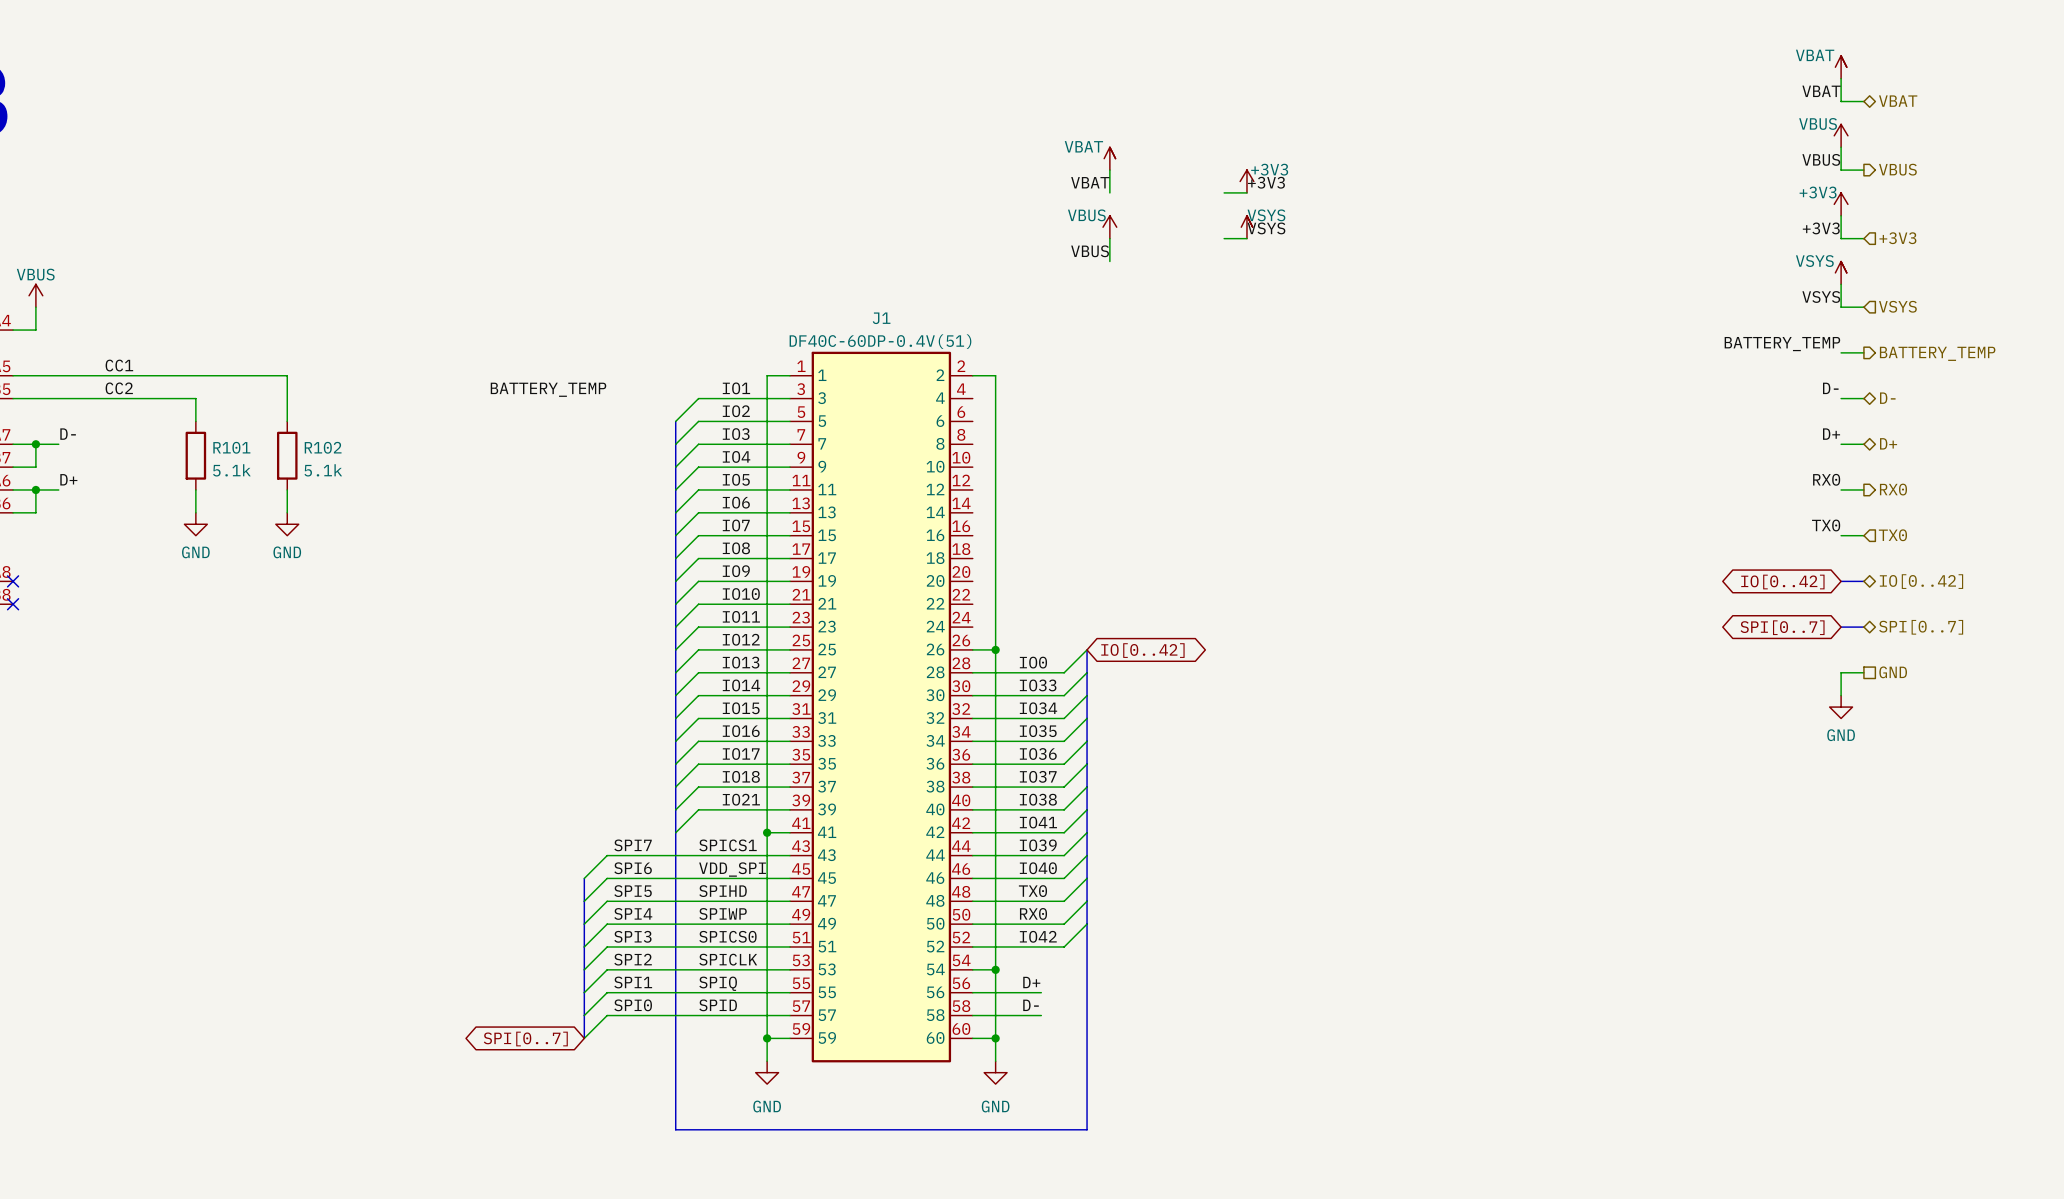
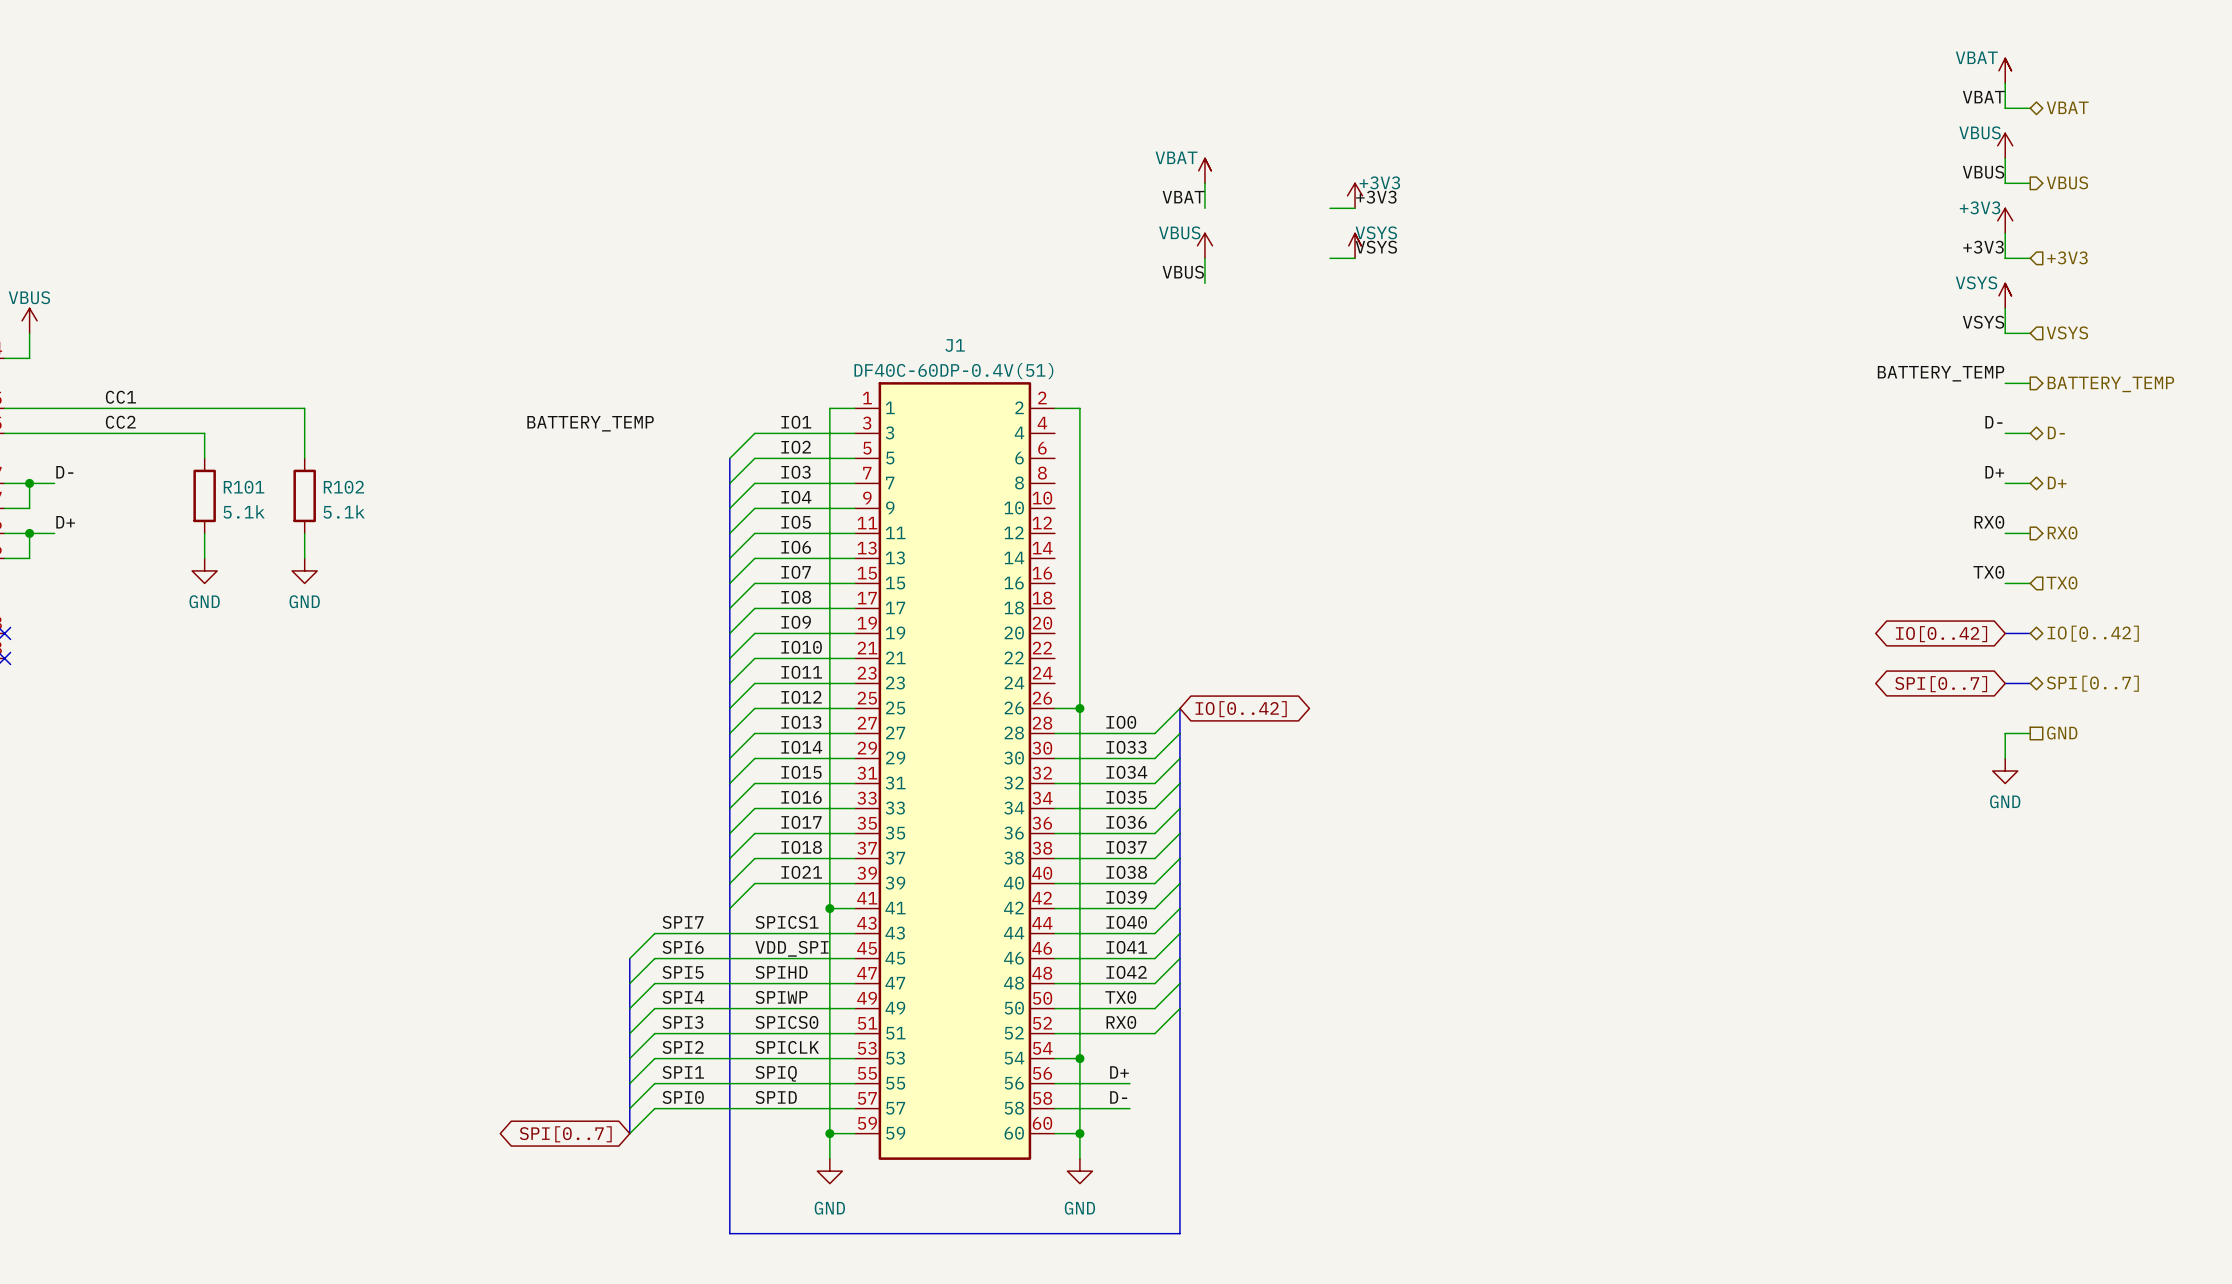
label: IO41 (1038, 822) -> IO39 (1126, 897)
label: IO39 (1038, 845) -> IO40 (1126, 922)
label: IO40 (1038, 868) -> IO41 (1126, 947)
label: TX0 (1032, 891) -> IO42 (1126, 972)
label: RX0 (1033, 913) -> TX0 (1120, 997)
label: IO42 (1038, 936) -> RX0 (1121, 1022)

